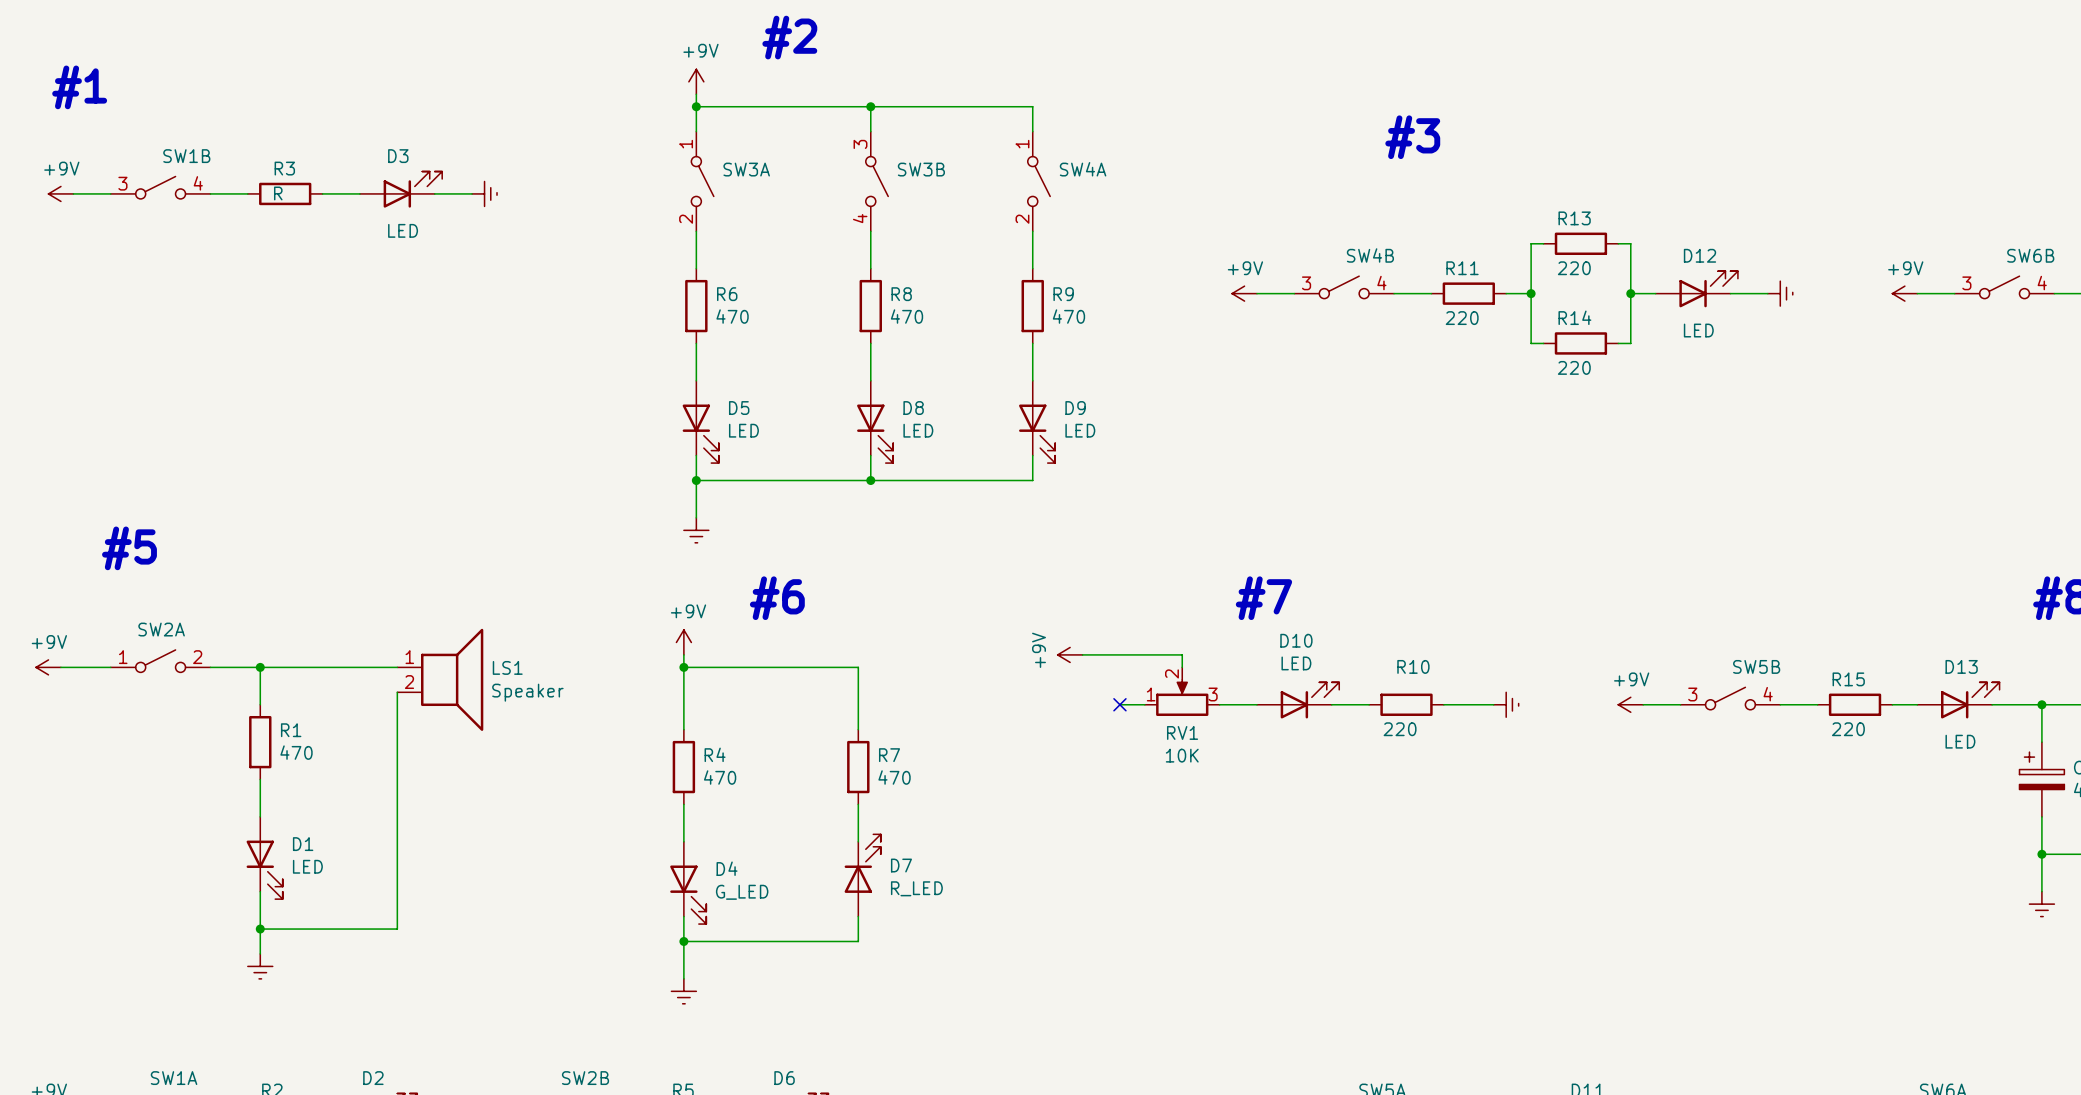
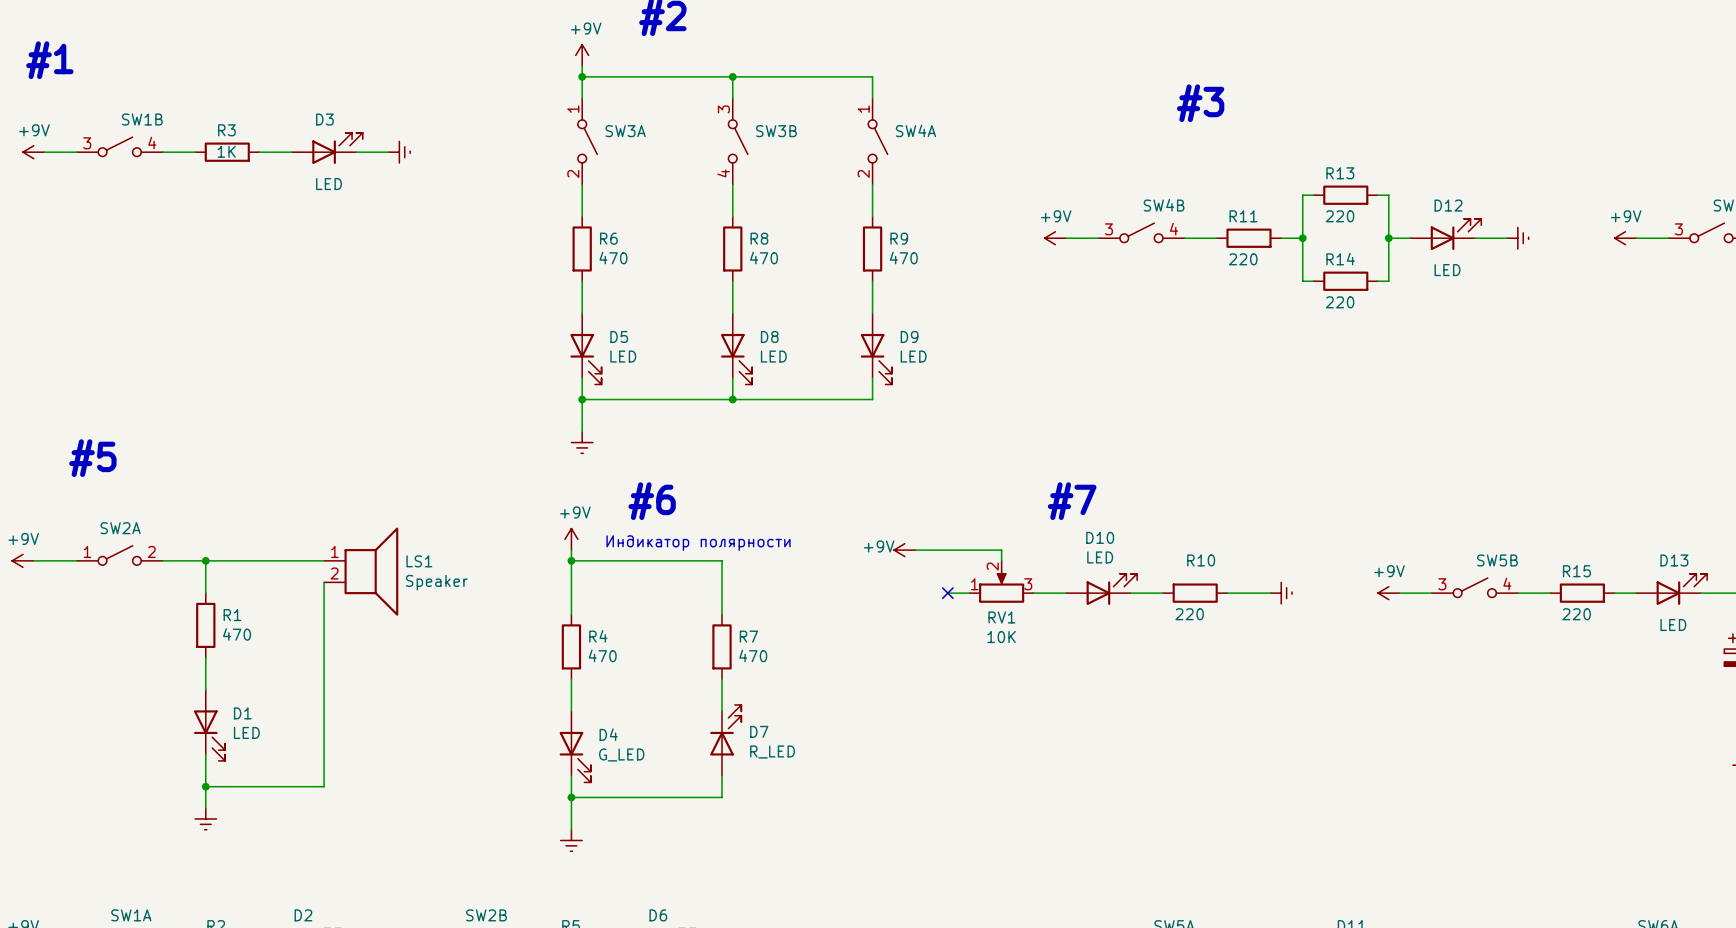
R3 value: R (278, 193) -> 1K (226, 151)
text: none -> Индикатор полярности (698, 543)
power symbol text rotation: 0° (1039, 650) -> 90° clockwise (879, 546)

